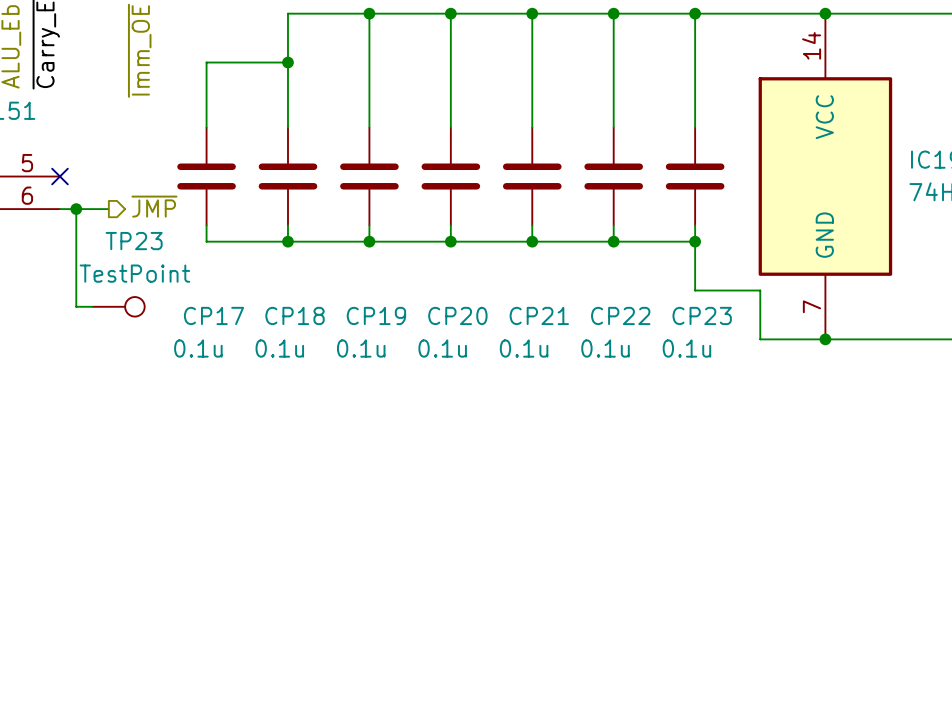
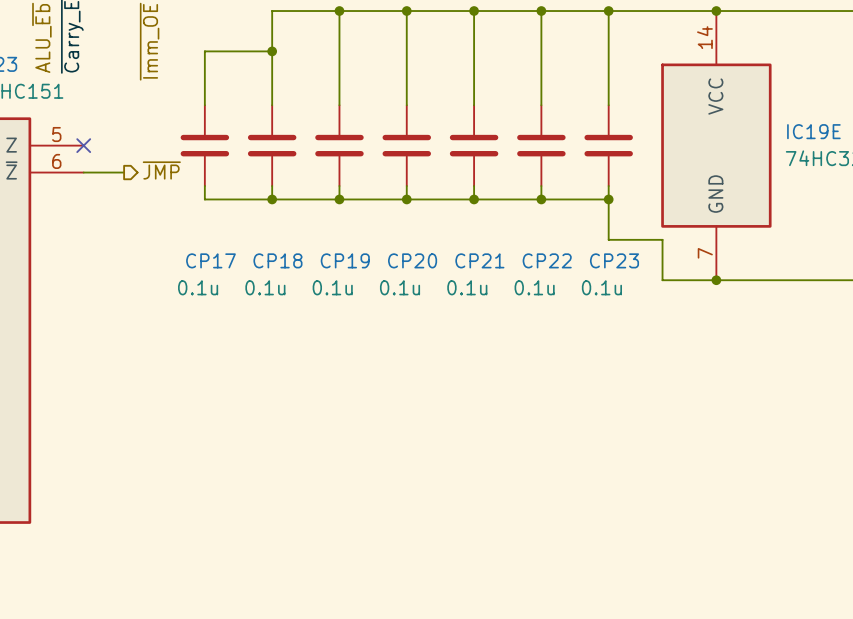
wire: (76, 209) (76, 306) (92, 306) -> none
junction: (76, 209) -> none
TP23: TestPoint (118, 306) -> none

